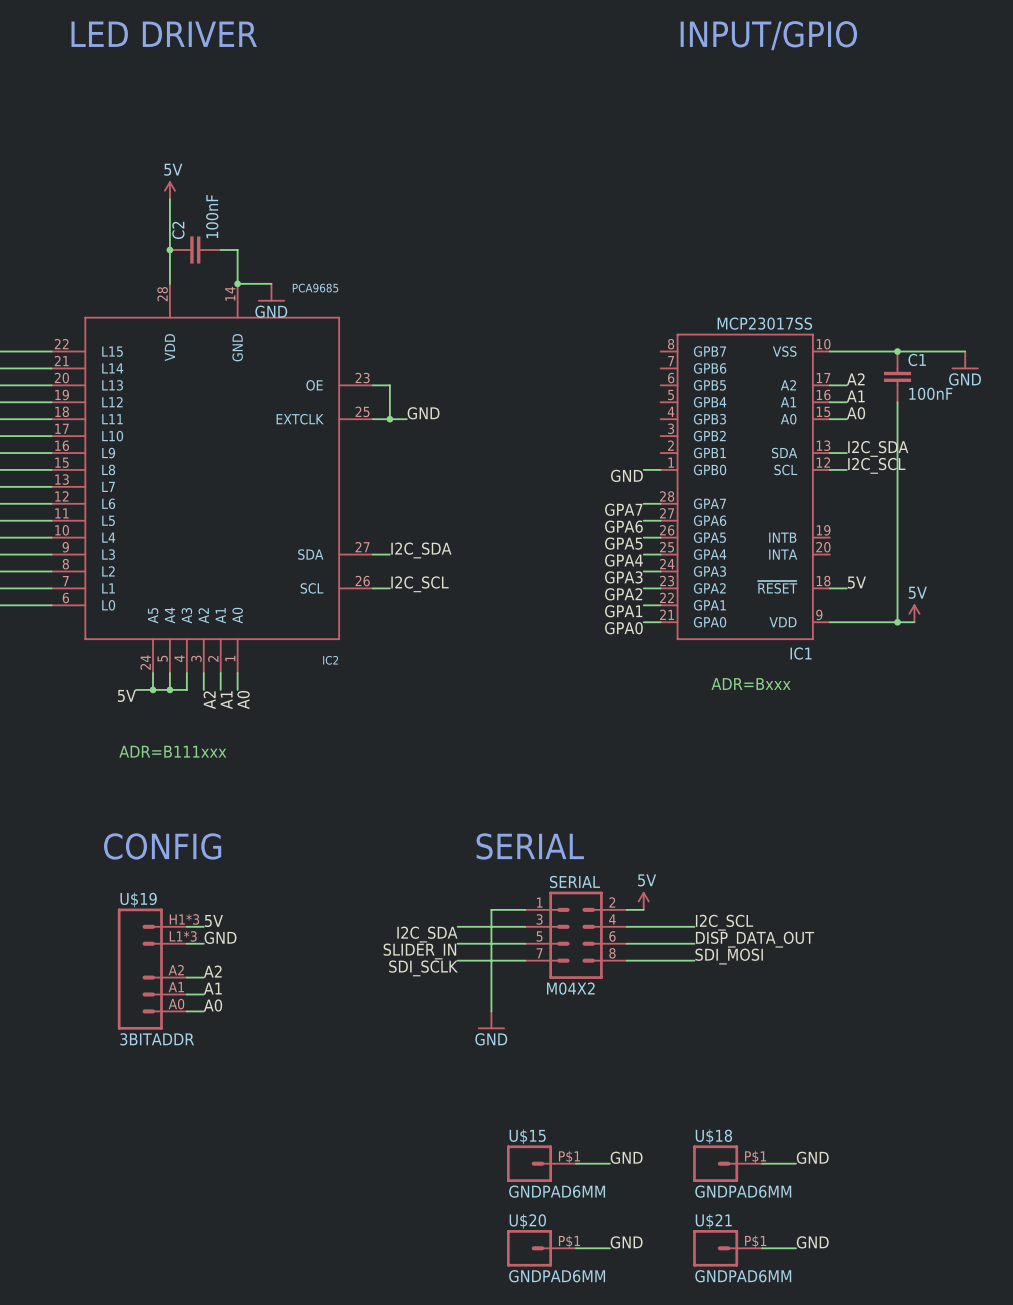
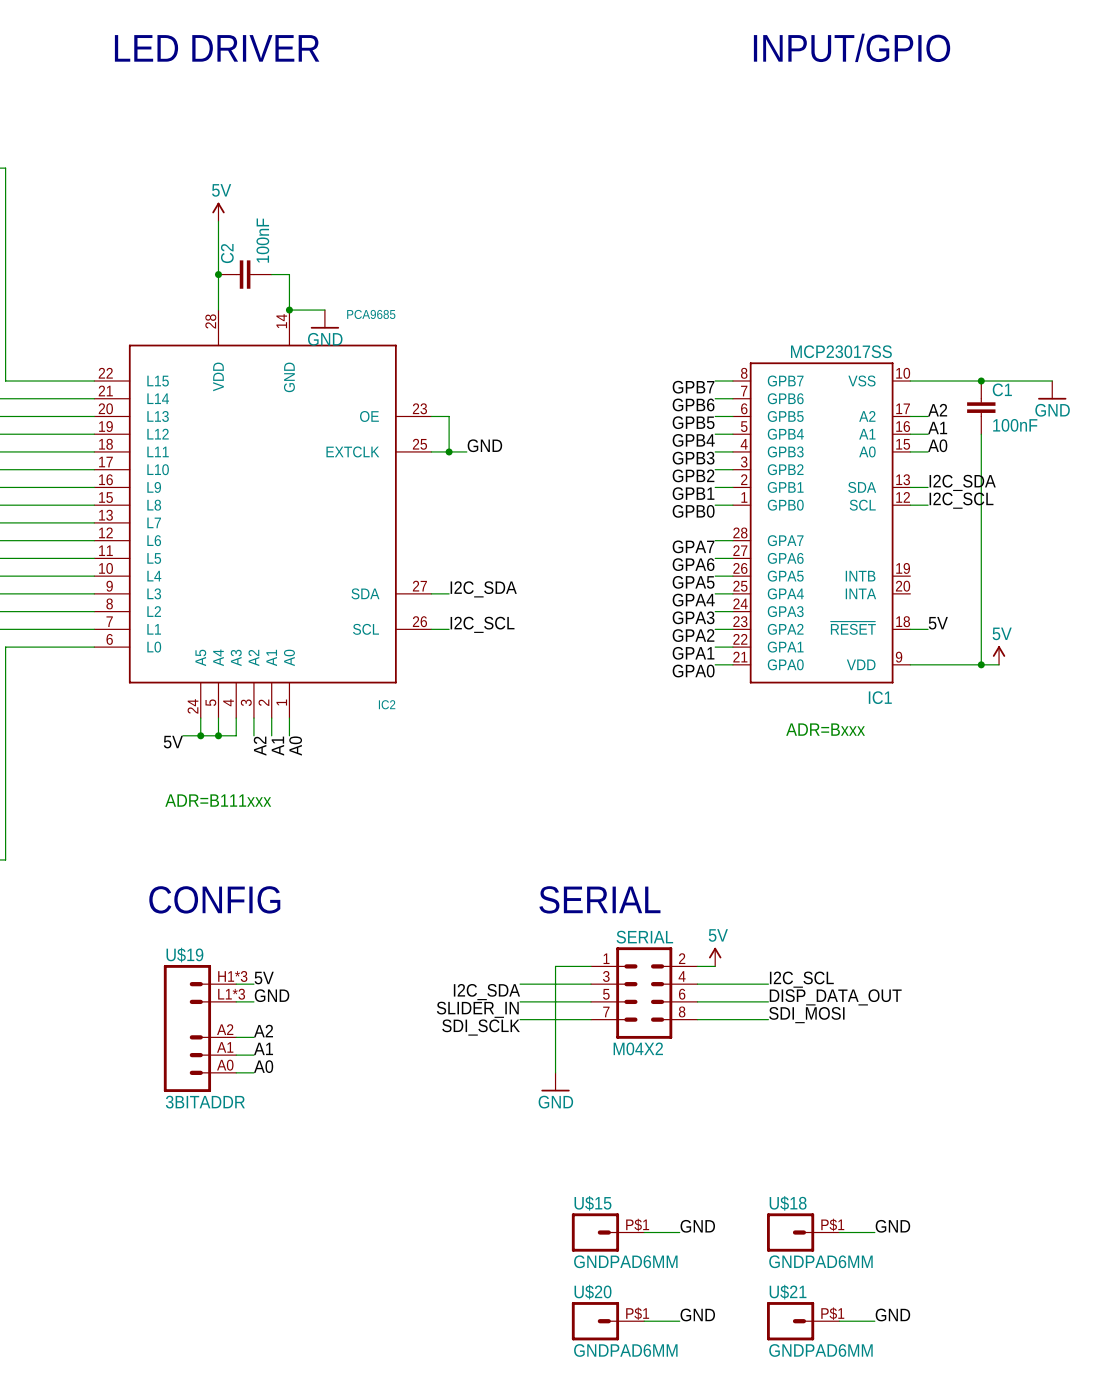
wire: none -> (715, 381) (732, 381)
label: none -> GPB7 (693, 387)
wire: none -> (715, 398) (732, 398)
label: none -> GPB6 (693, 404)
wire: none -> (715, 416) (732, 416)
label: none -> GPB5 (693, 422)
wire: none -> (715, 434) (732, 434)
label: none -> GPB4 (693, 440)
wire: none -> (715, 451) (732, 451)
label: none -> GPB3 (693, 458)
wire: none -> (715, 469) (732, 469)
label: none -> GPB2 (693, 475)
wire: none -> (715, 487) (732, 487)
label: none -> GPB1 (693, 493)
label: GND (626, 475) -> GPB0 (693, 511)

